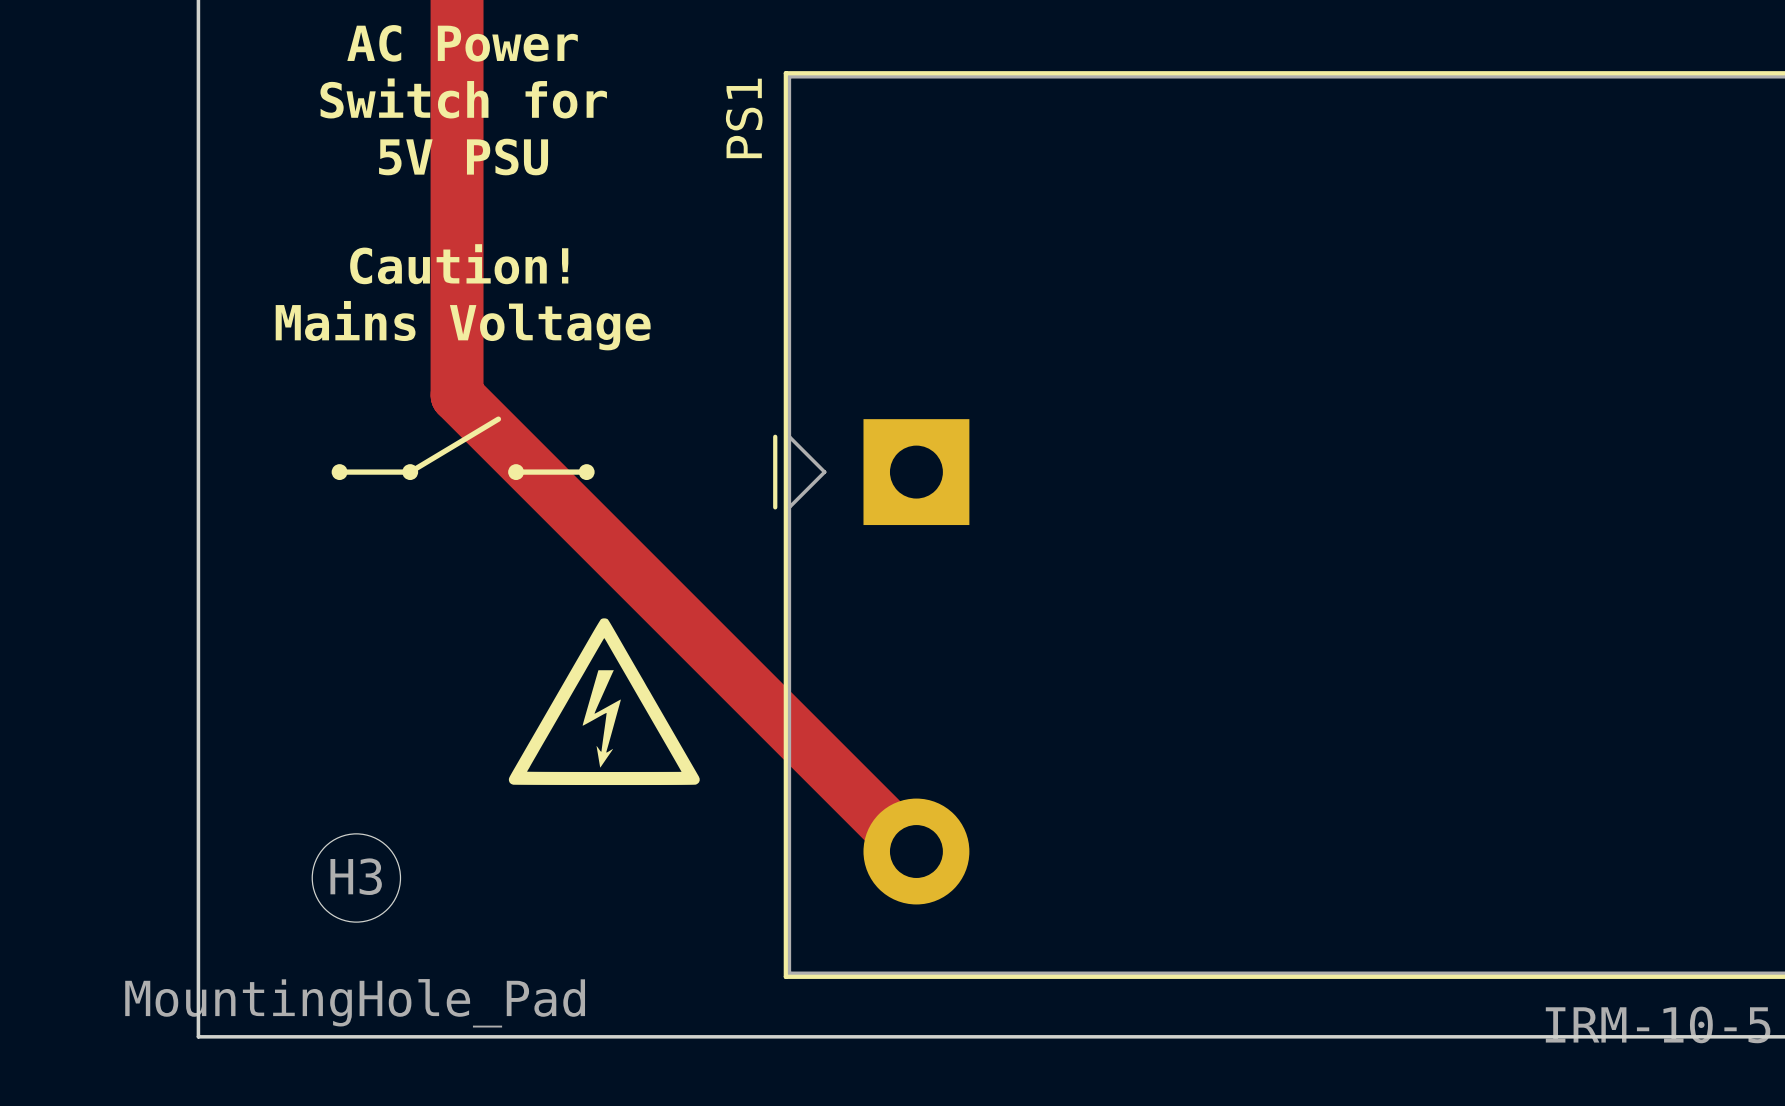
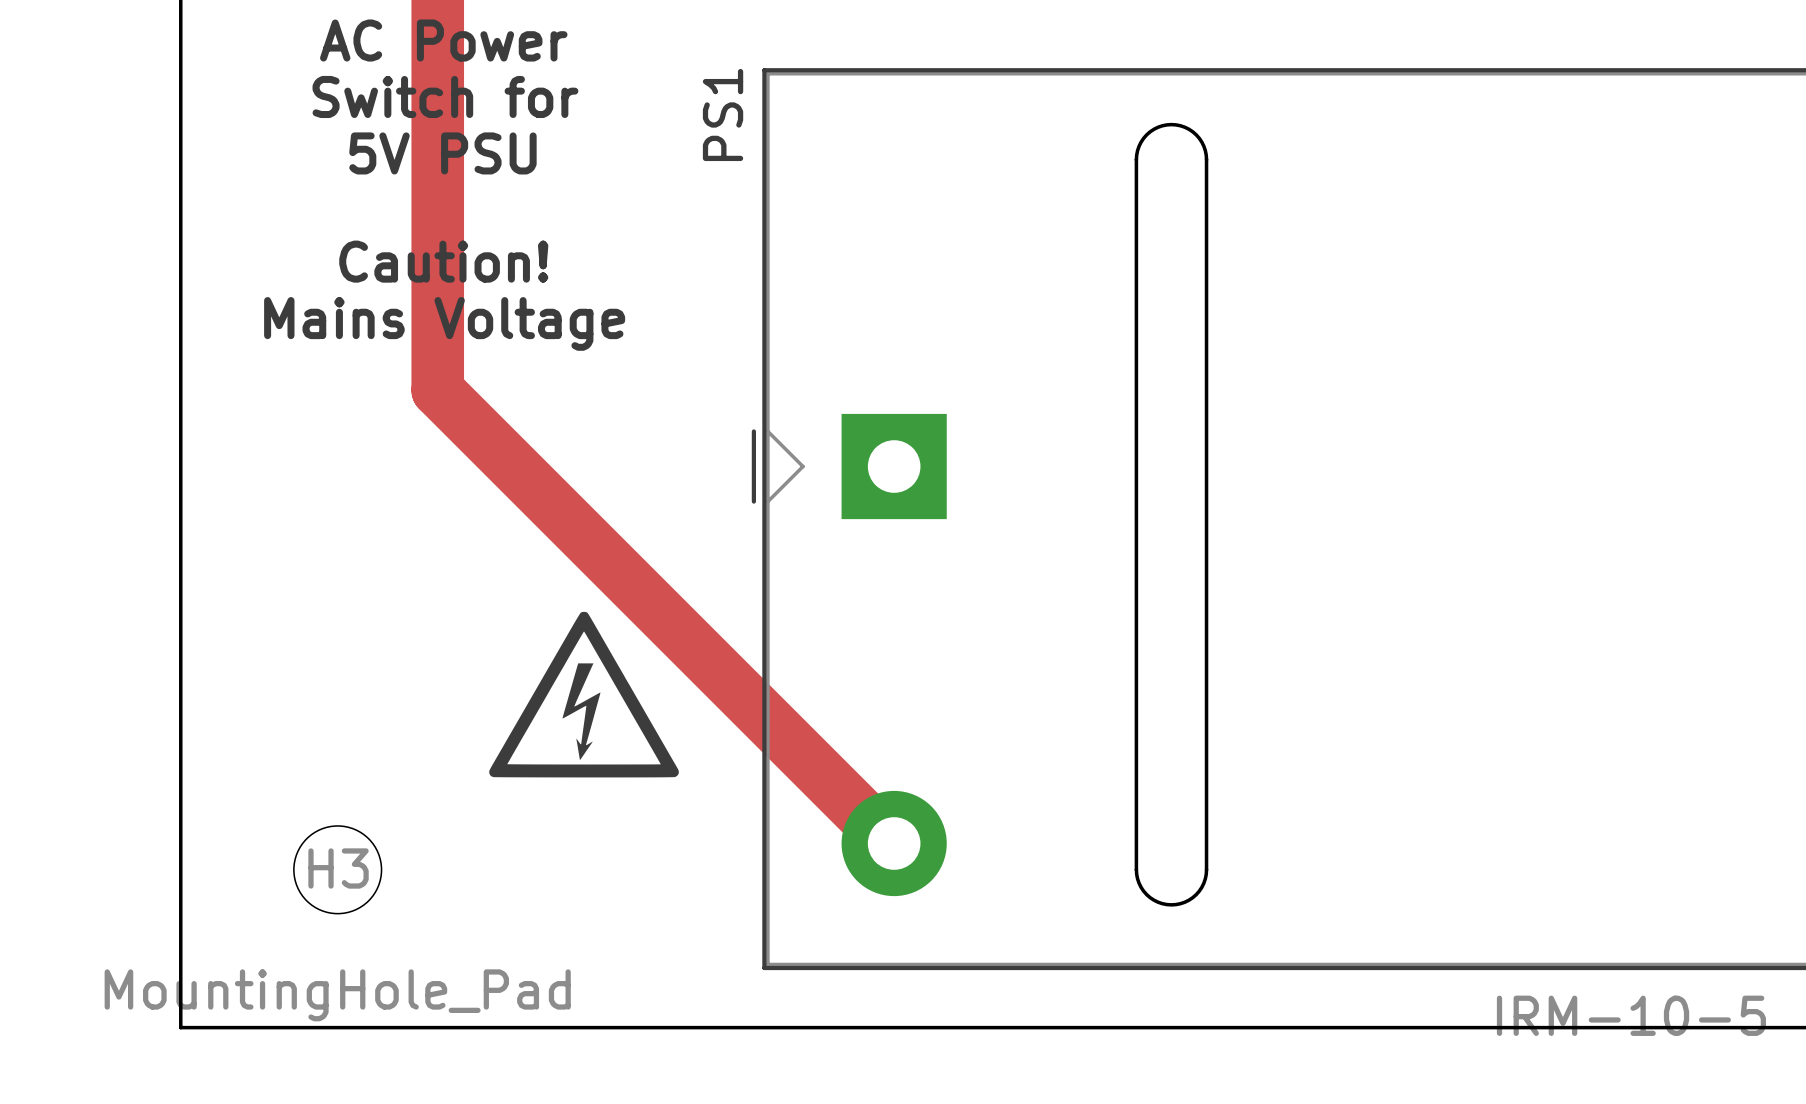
board edge: none -> (1136, 159) (1136, 869) (1139, 883) (1146, 894) (1158, 902) (1171, 904) (1184, 902) (1196, 894) (1203, 883) (1206, 869) (1206, 159) (1203, 146) (1196, 134) (1184, 127) (1171, 124) (1158, 127) (1146, 134) (1139, 146) (1136, 159)
line: (498, 419) (410, 472) (339, 472) -> none
drawing: [331, 464, 348, 481] -> none
drawing: [402, 464, 419, 481] -> none
drawing: [508, 464, 525, 481] -> none
drawing: [578, 464, 595, 481] -> none
line: (516, 472) (586, 472) -> none

